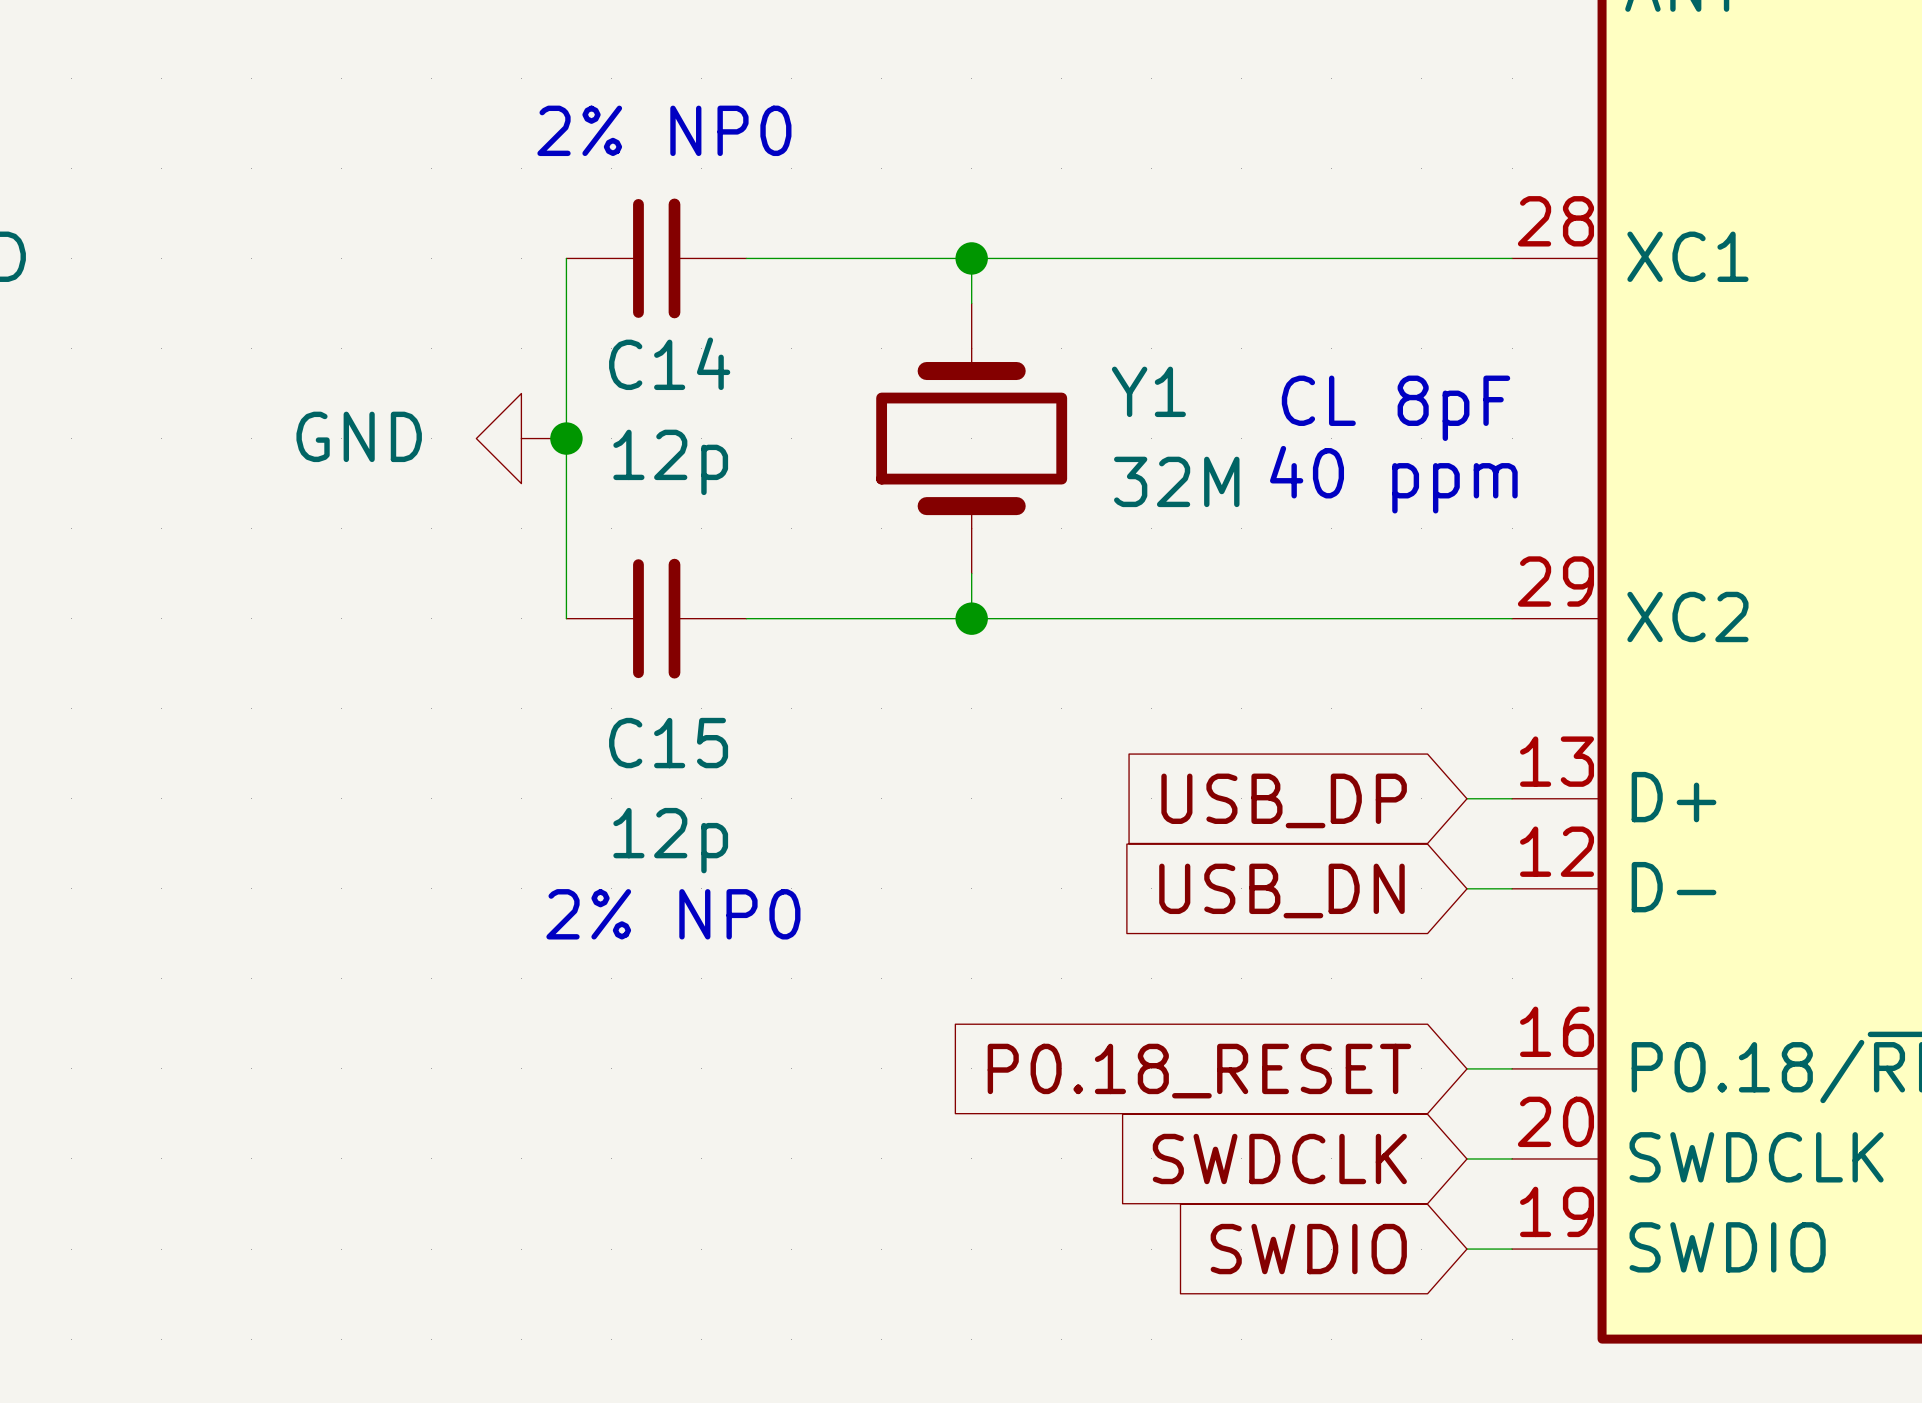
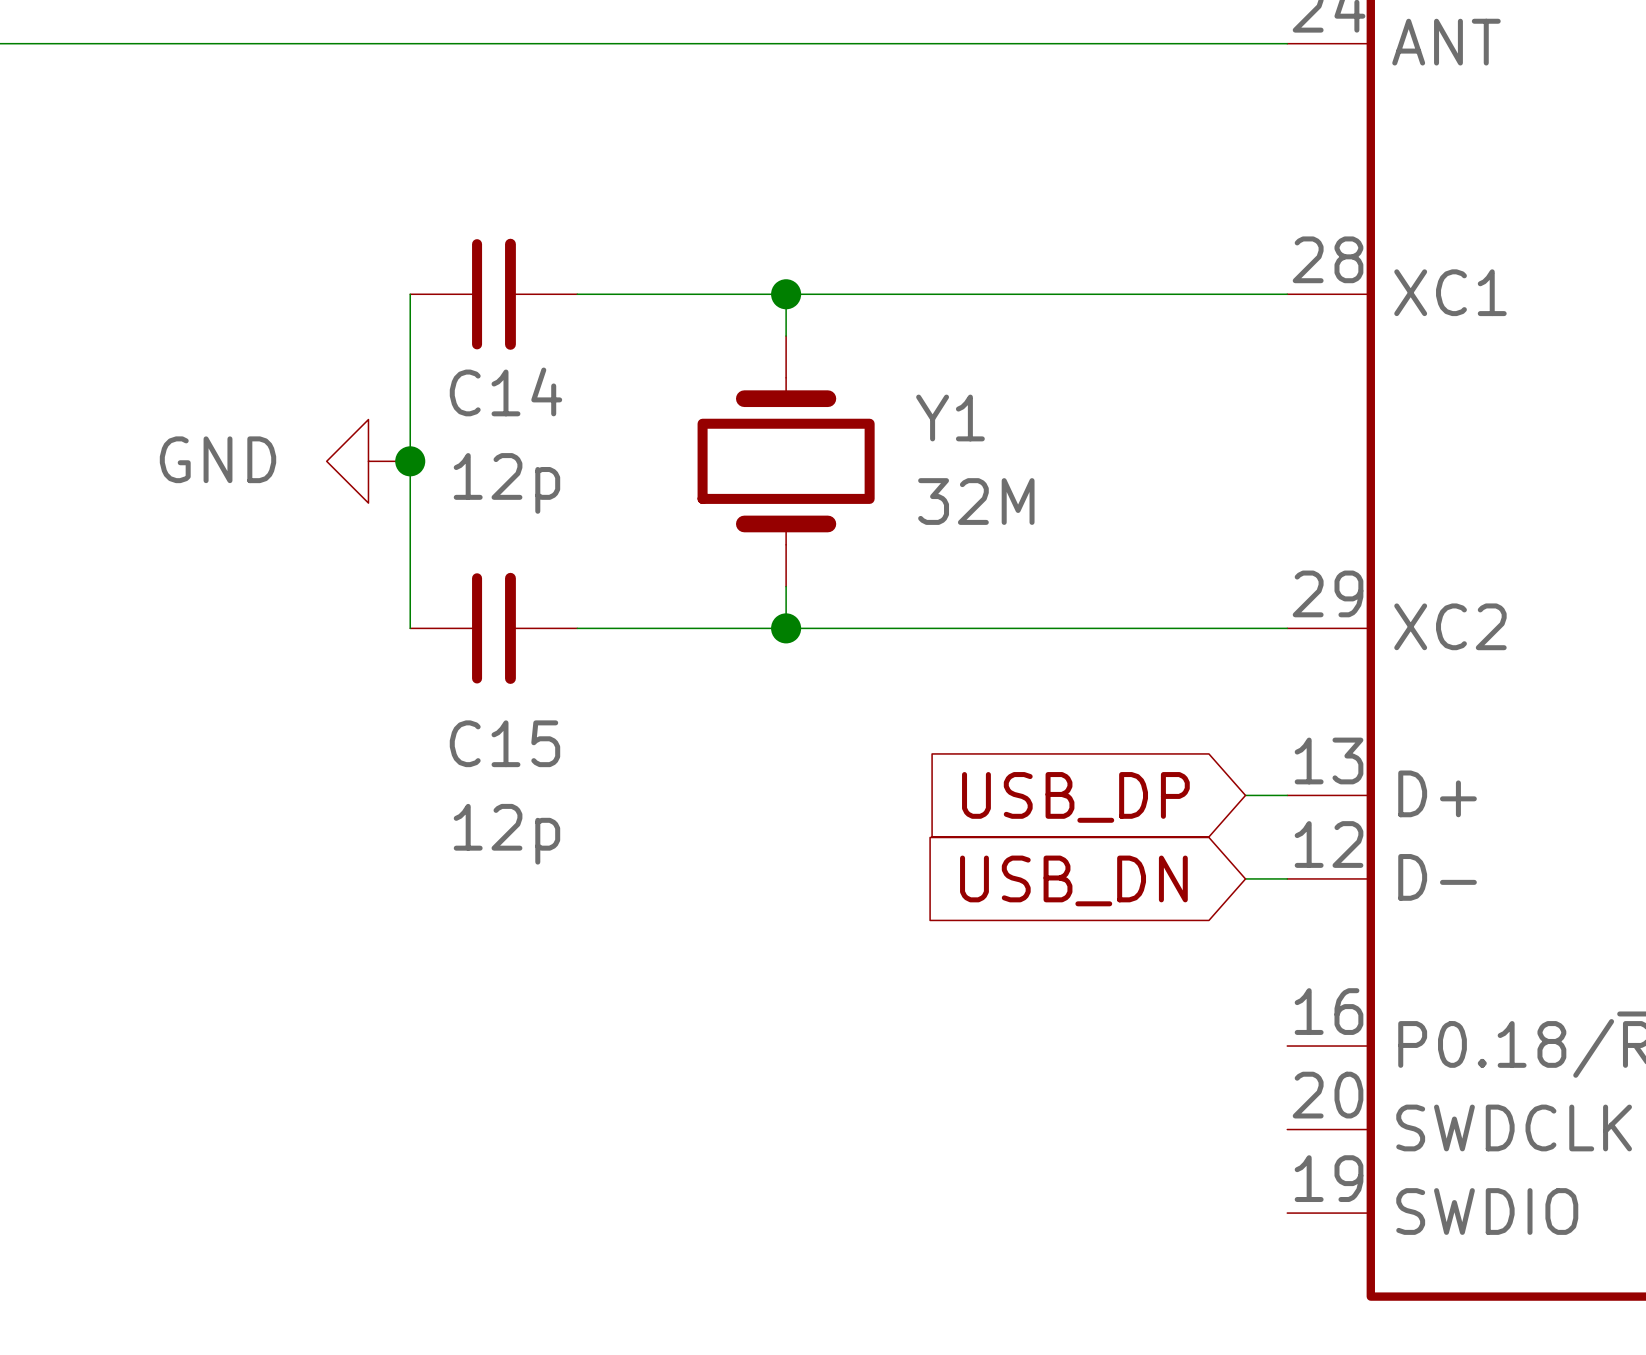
text: 2% NP0 (664, 130) -> none
text: CL 8pF (1396, 408) -> none
text: 40 ppm (1393, 479) -> none
text: 2% NP0 (673, 914) -> none
wire: (1466, 1068) (1512, 1068) -> none
global label: P0.18_RESET (1199, 1071) -> none
global label: SWDCLK (1279, 1158) -> none
wire: (1466, 1158) (1512, 1158) -> none
global label: SWDIO (1308, 1249) -> none
wire: (1466, 1249) (1512, 1249) -> none

